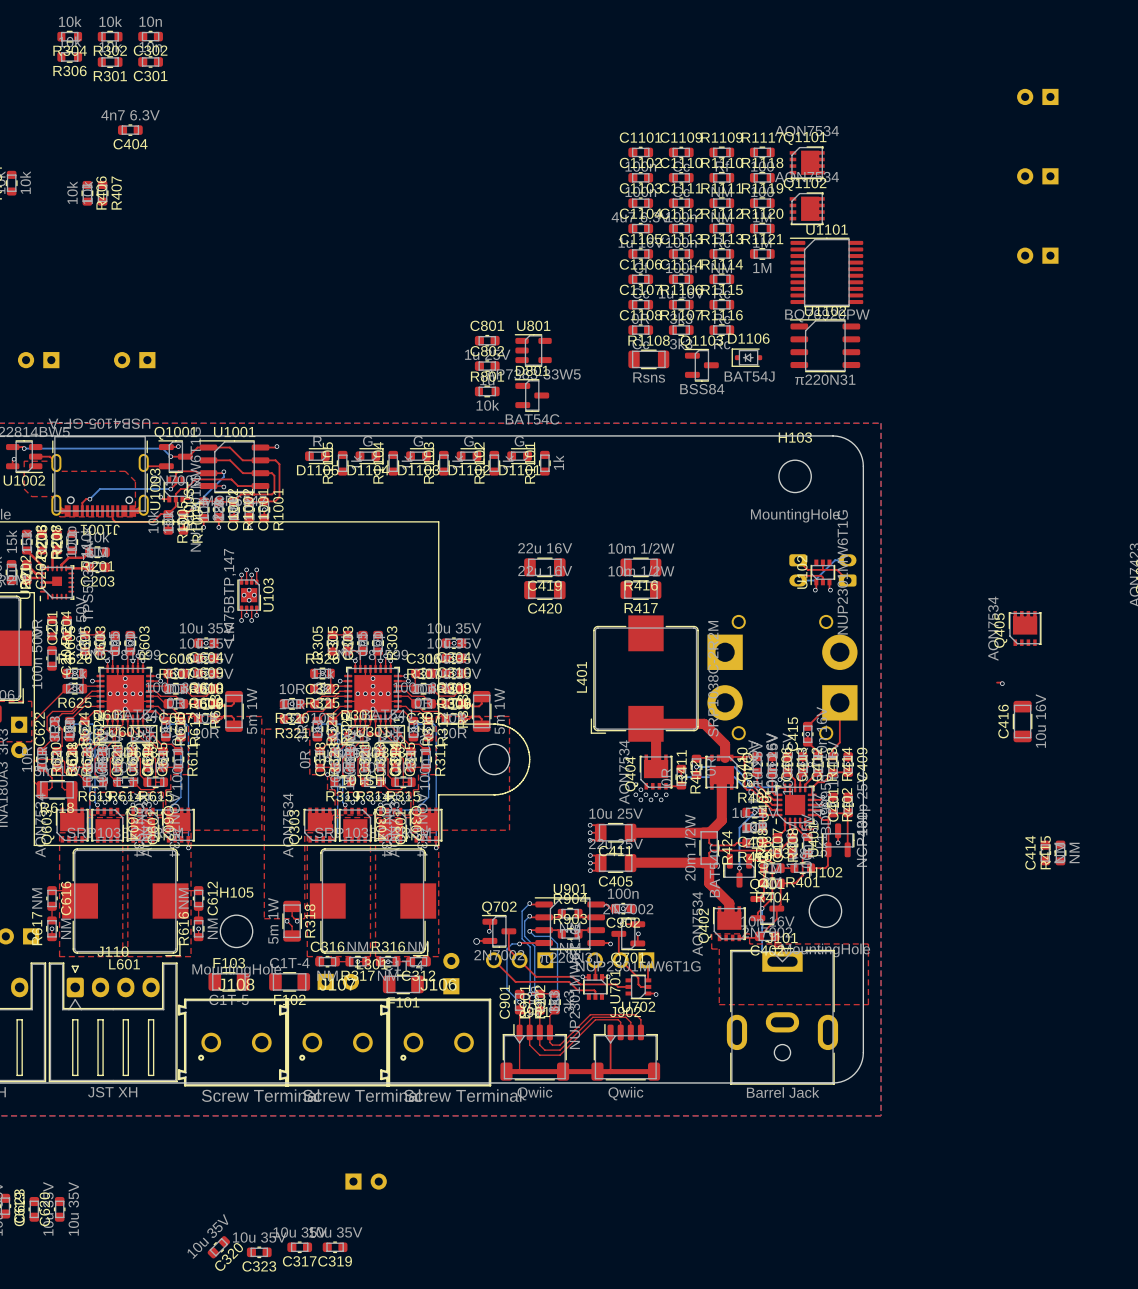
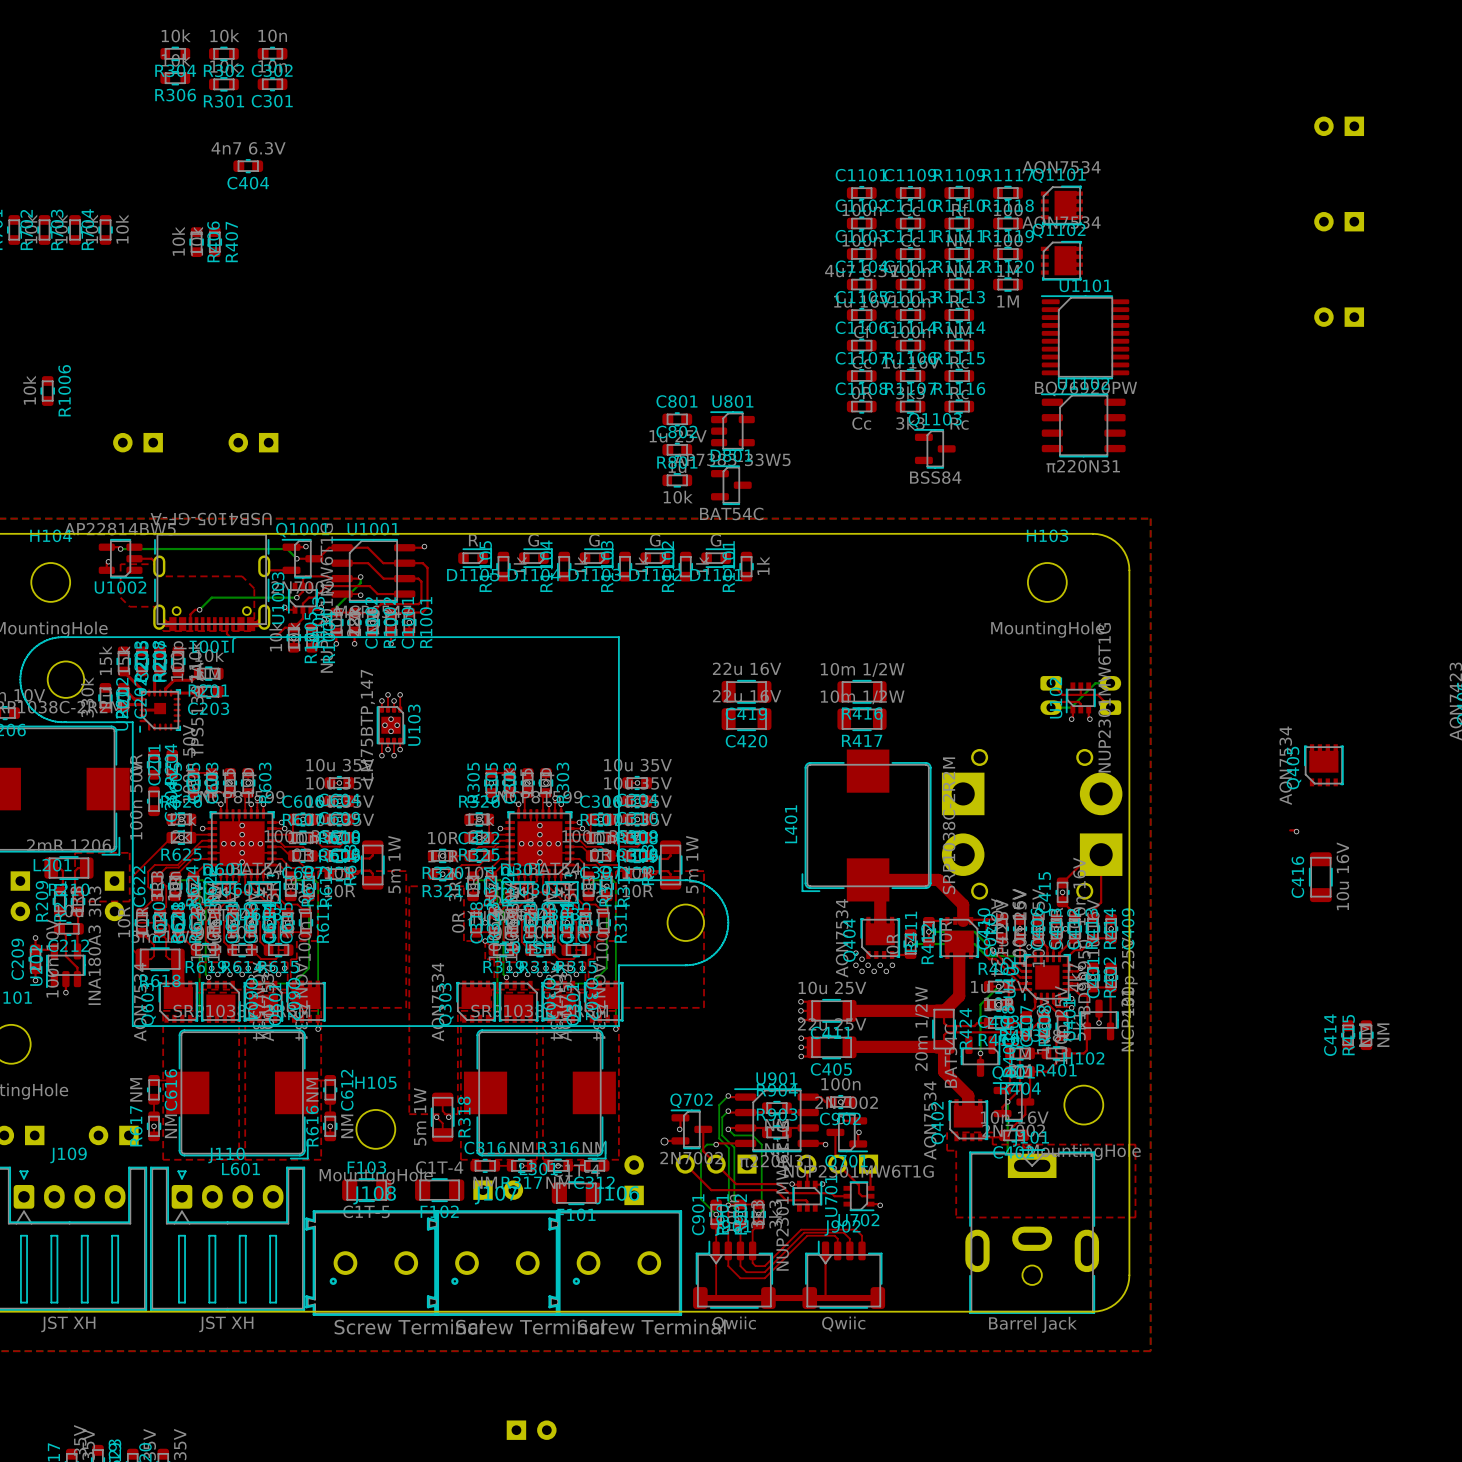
R1121: 1M (762, 253) -> none
D1106: BAT54J (746, 357) -> none
R1108: Rsns (648, 359) -> none

